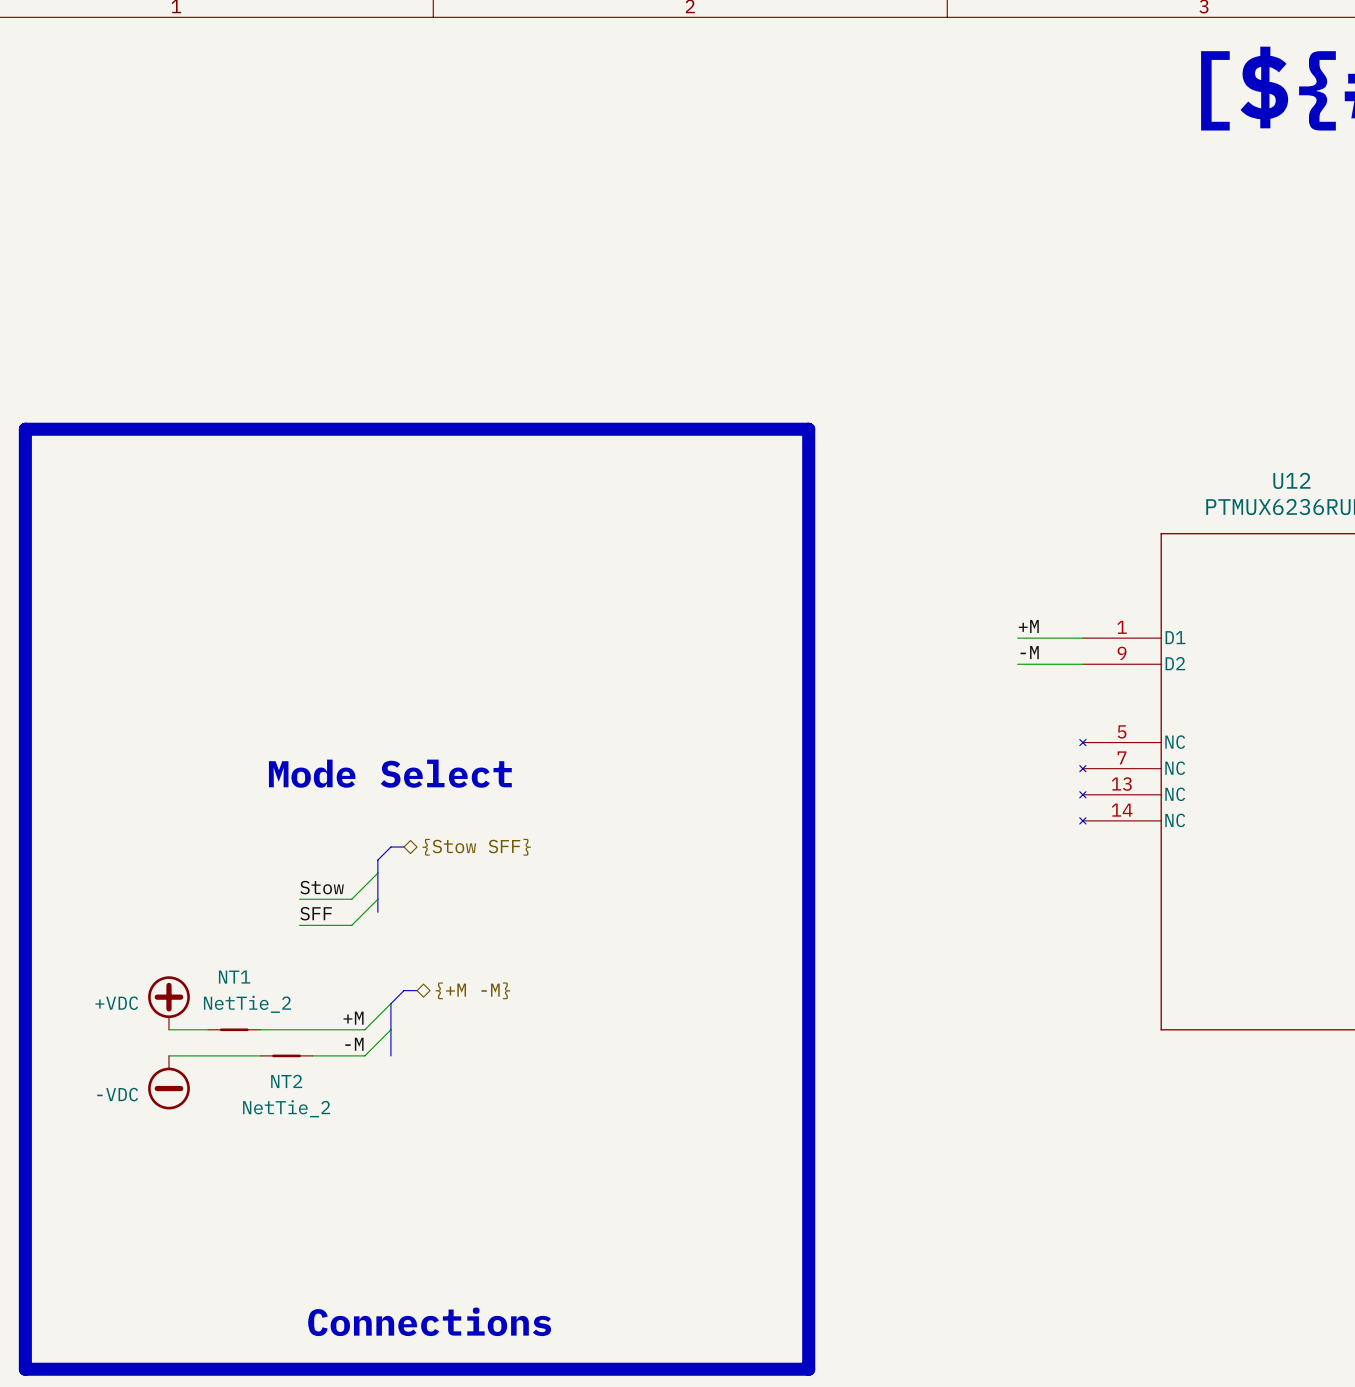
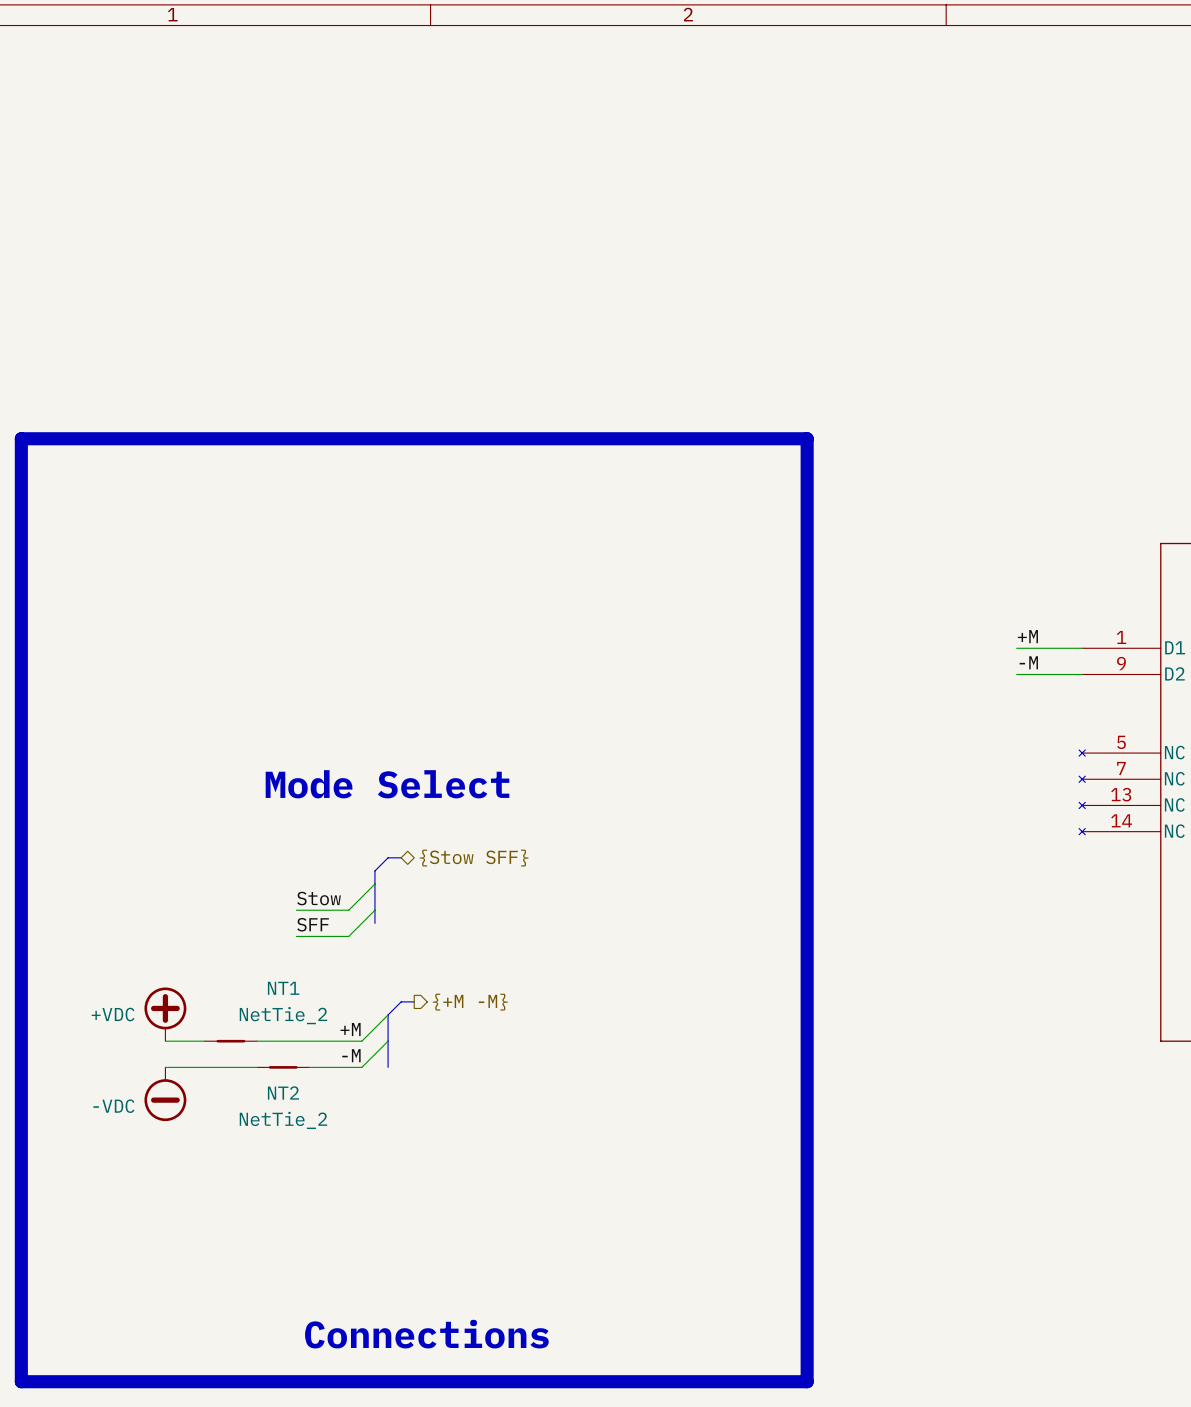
NT1 name position: NT1 (234, 977) -> NT1 (283, 988)
hierarchical label shape: bidirectional (472, 990) -> output (470, 1002)
NT1 value position: NetTie_2 (247, 1004) -> NetTie_2 (283, 1015)

